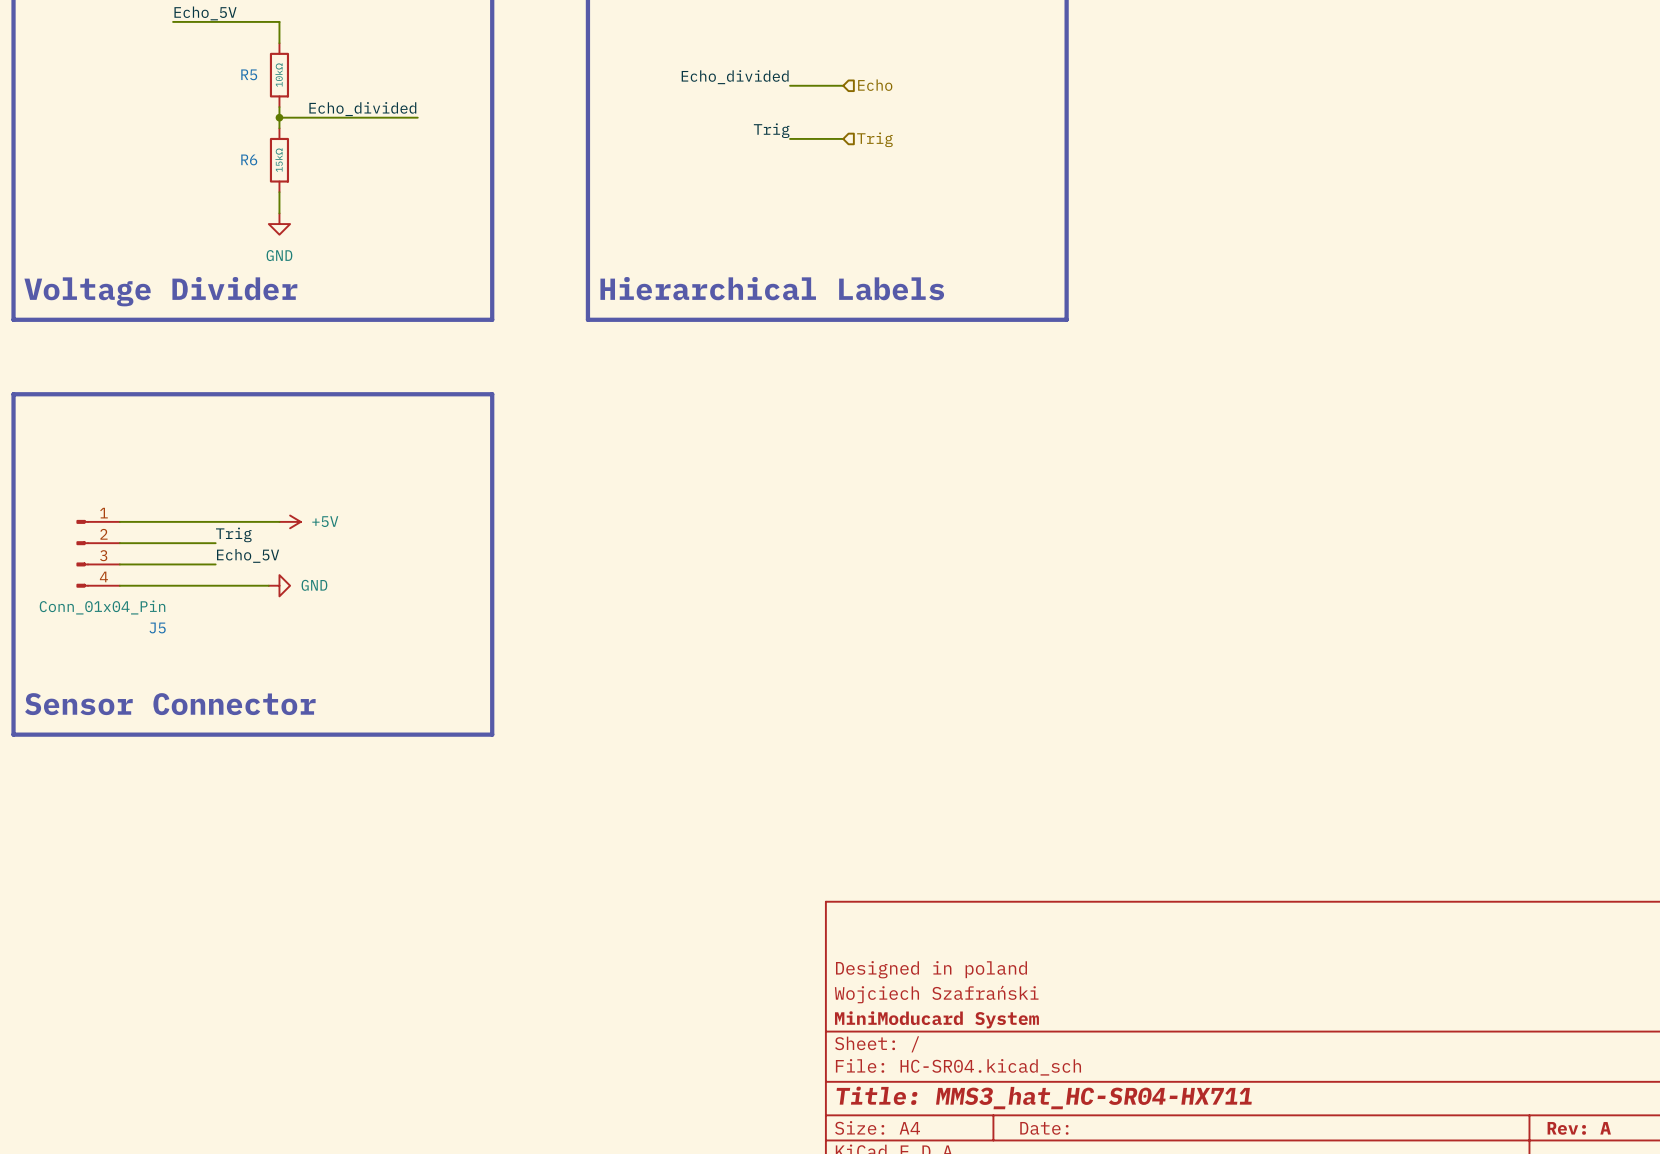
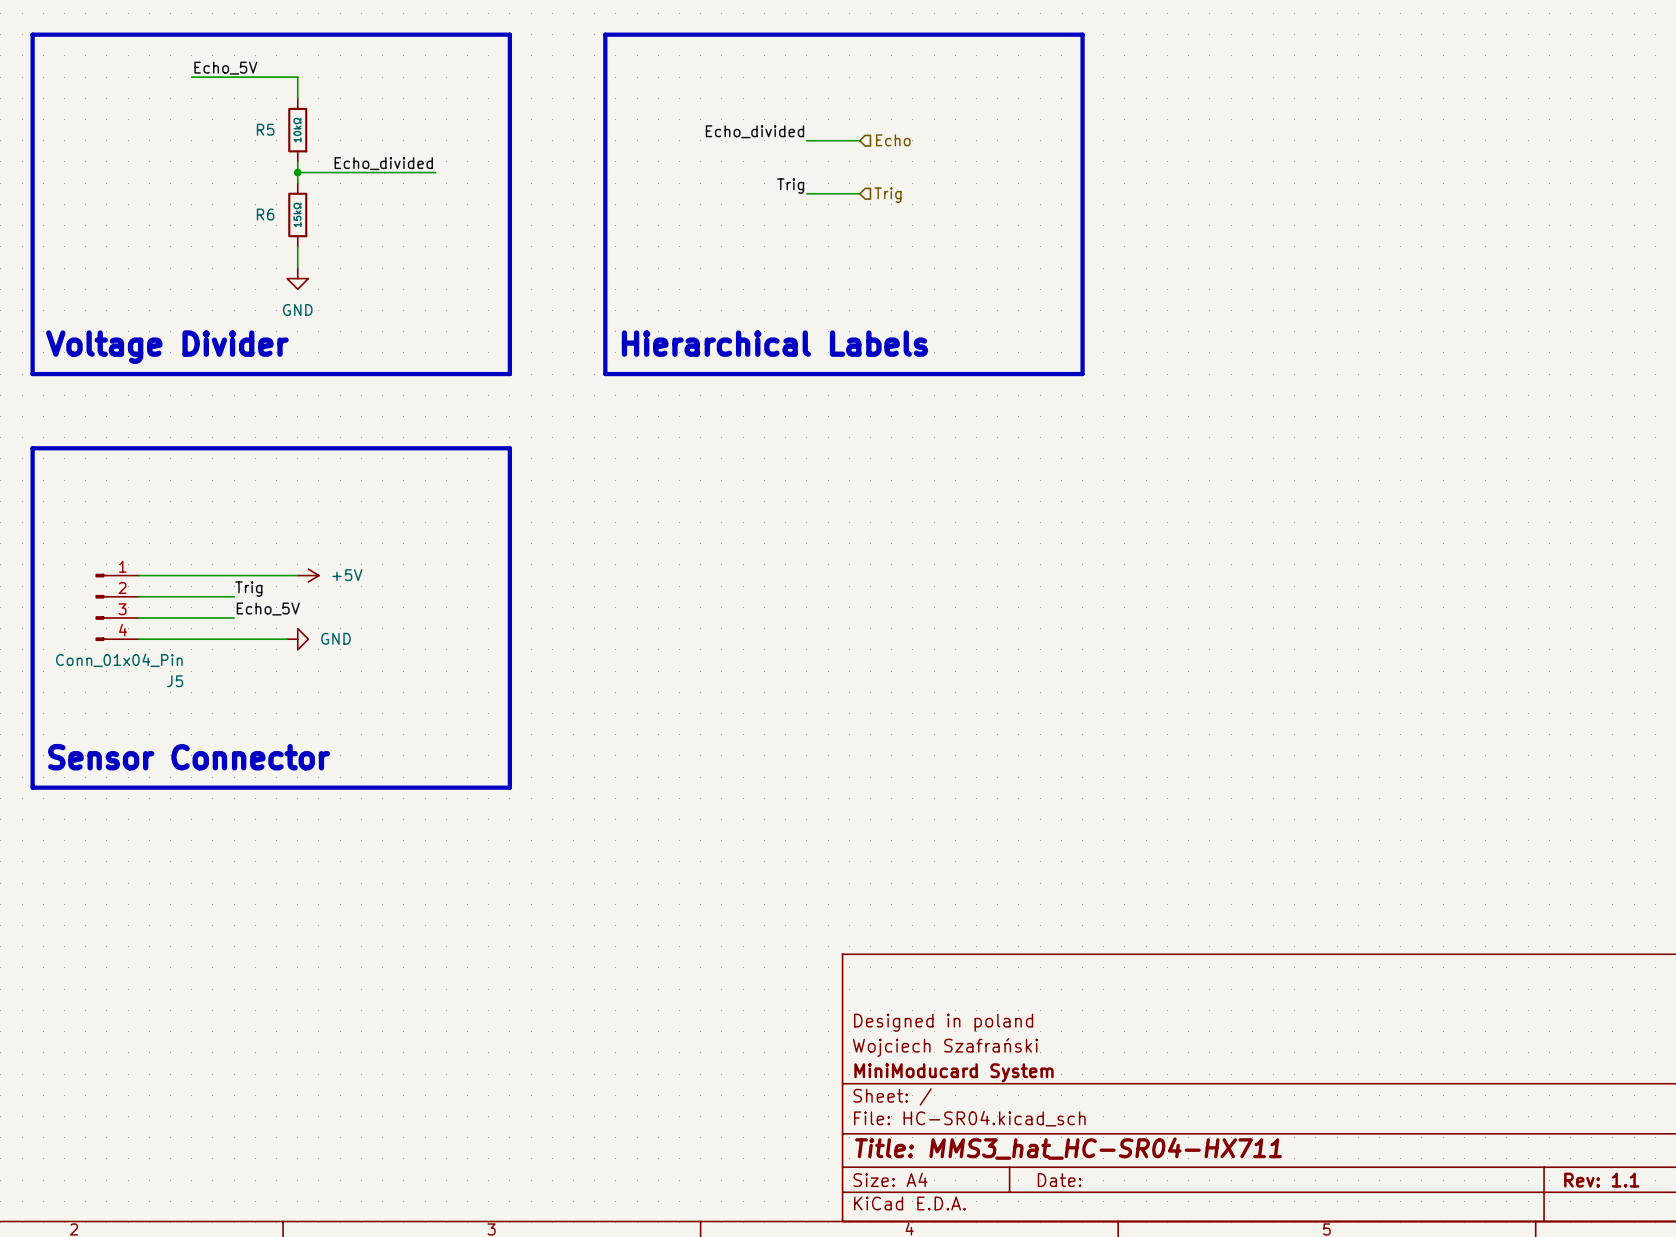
title block: Rev: A (1579, 1128) -> Rev: 1.1 (1601, 1180)

